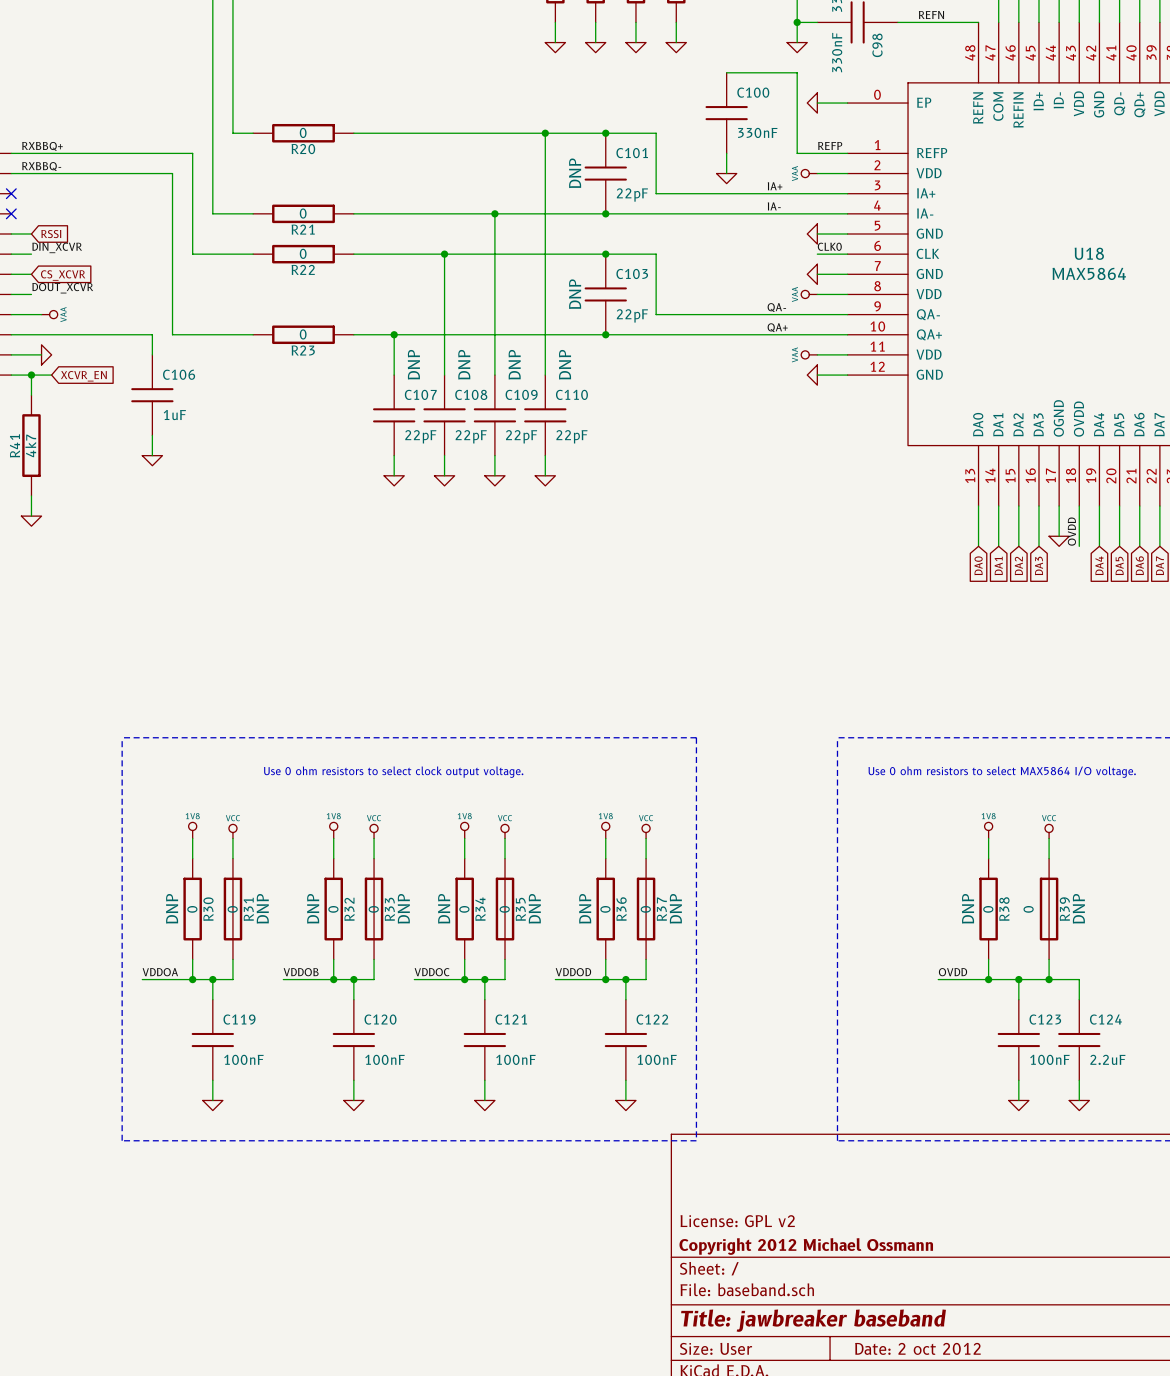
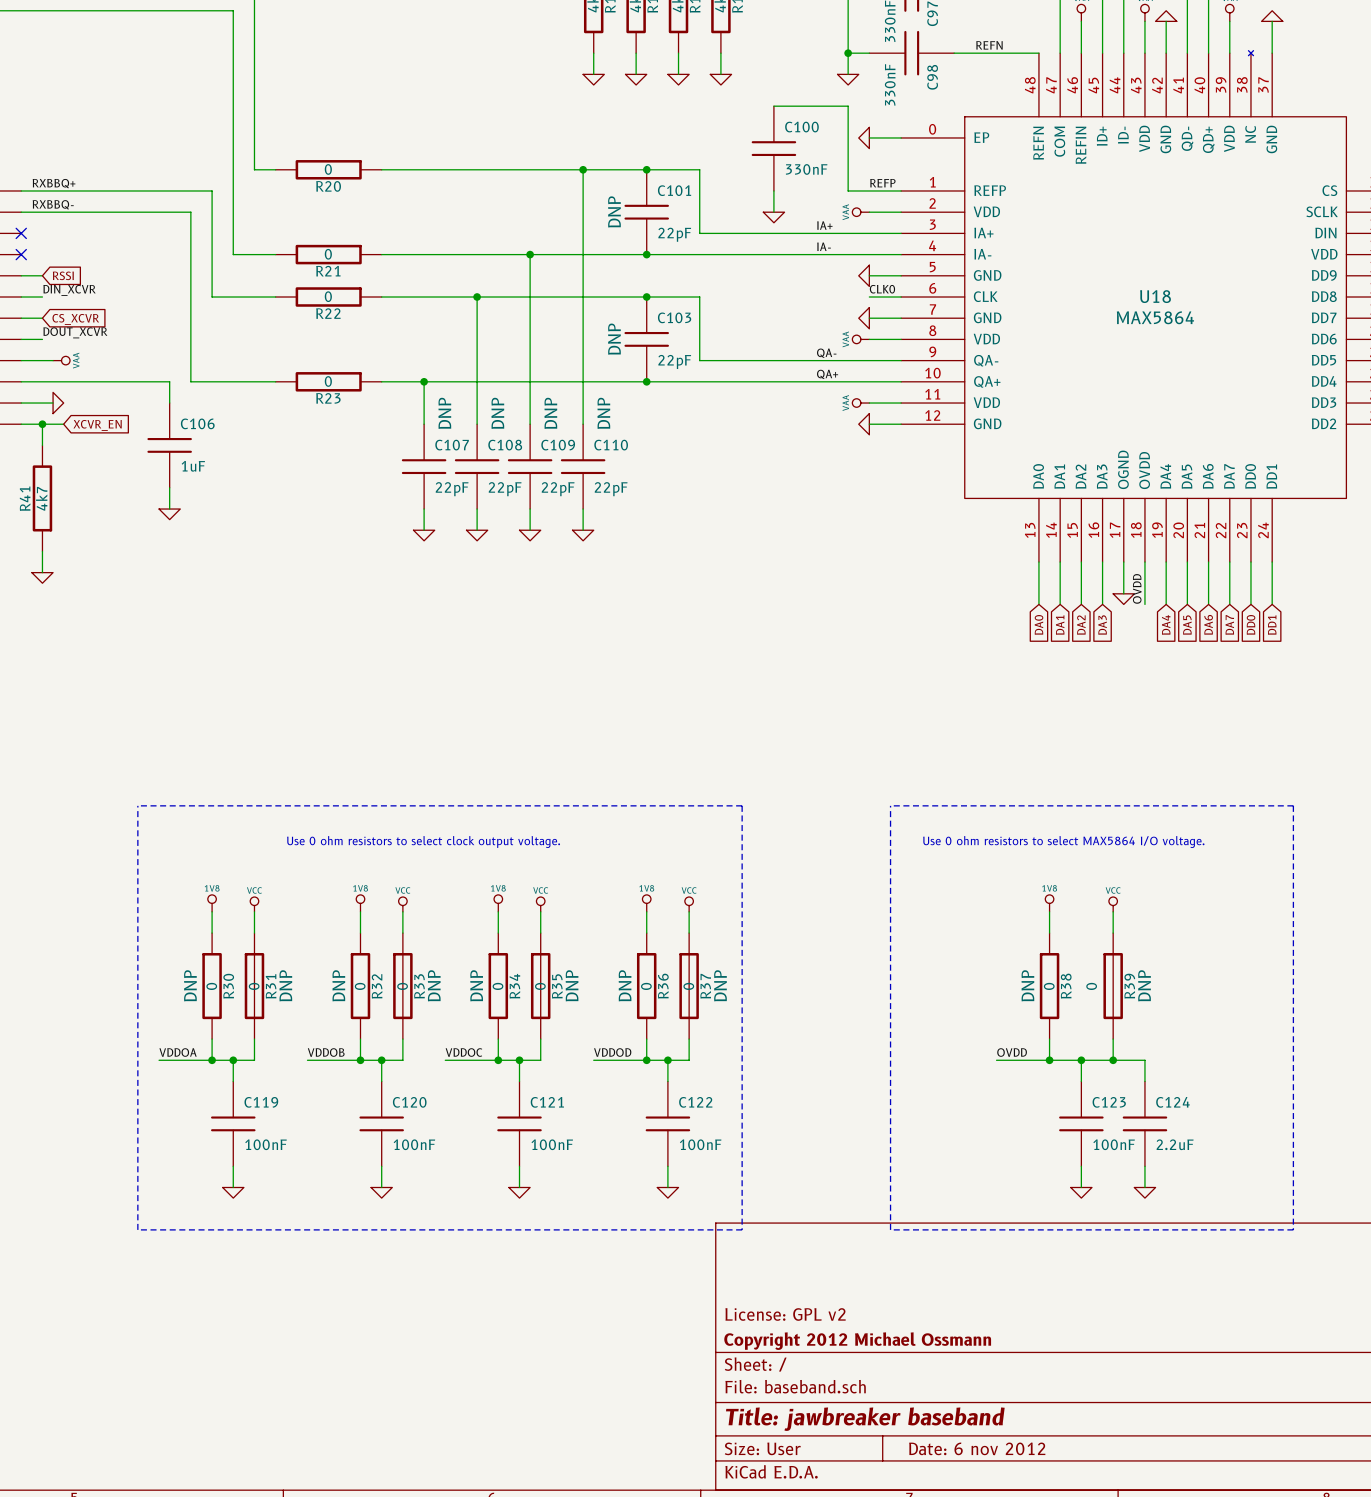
title block: Date: 2 oct 2012 (917, 1348) -> Date: 6 nov 2012 (977, 1448)

